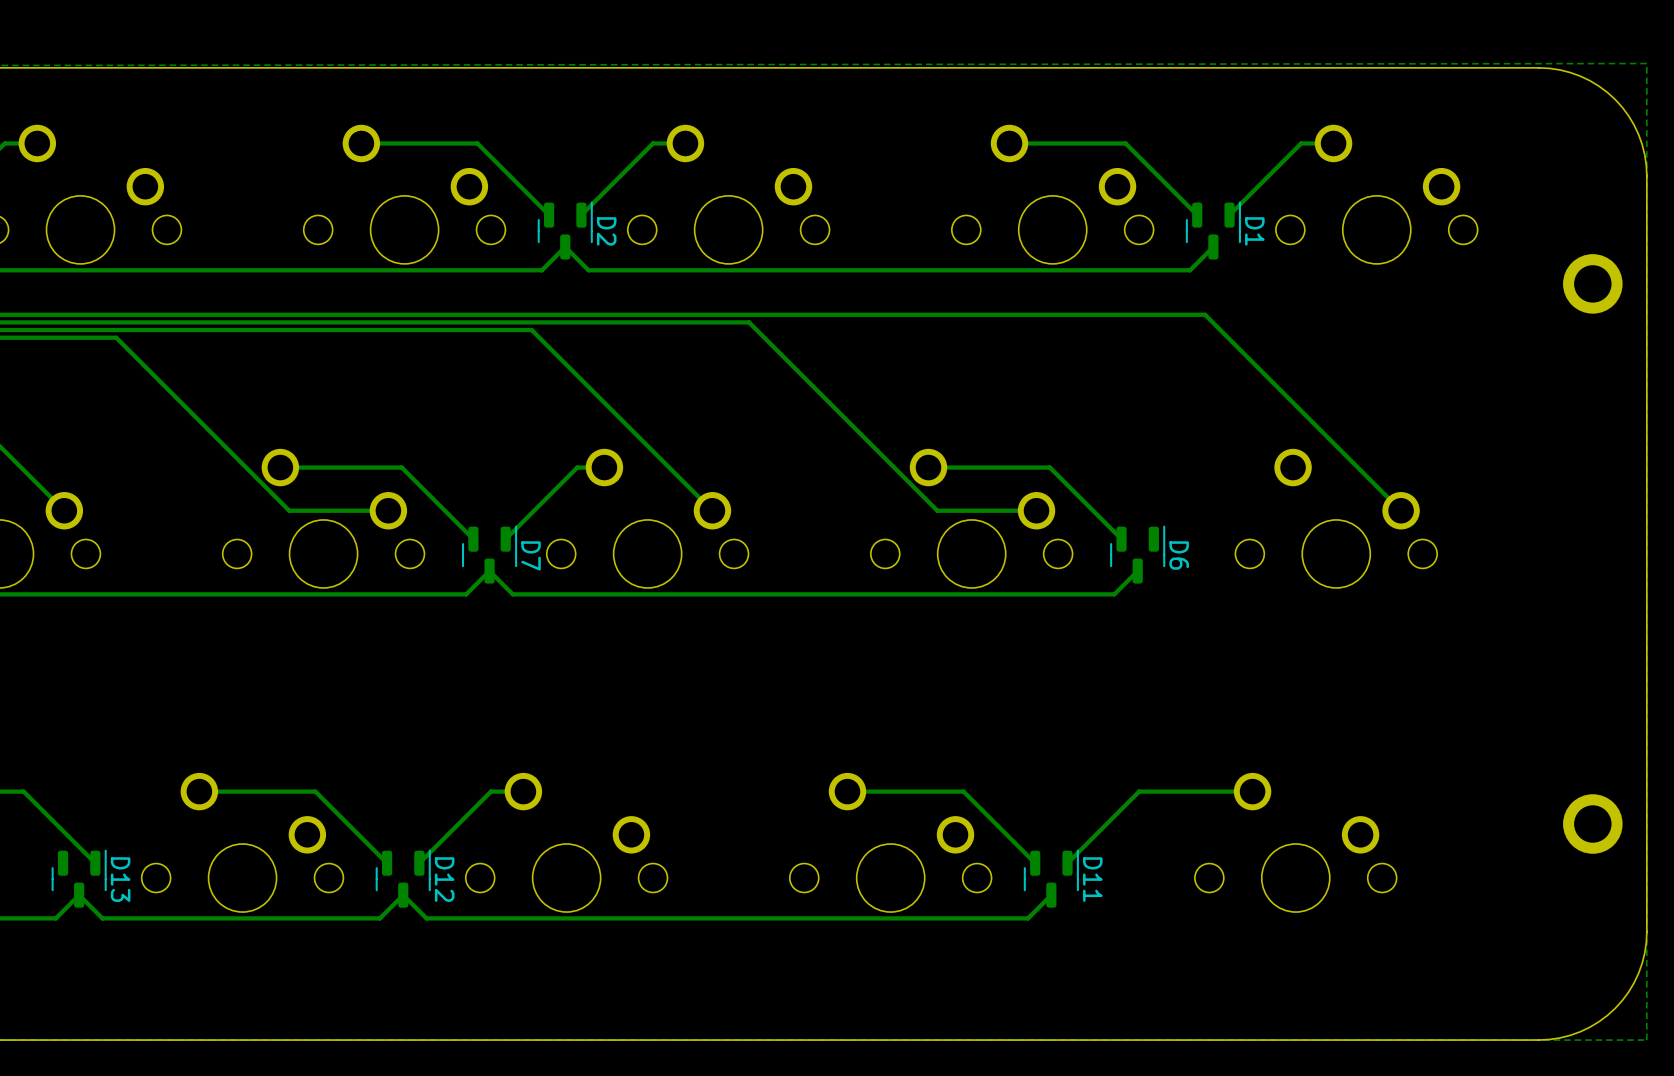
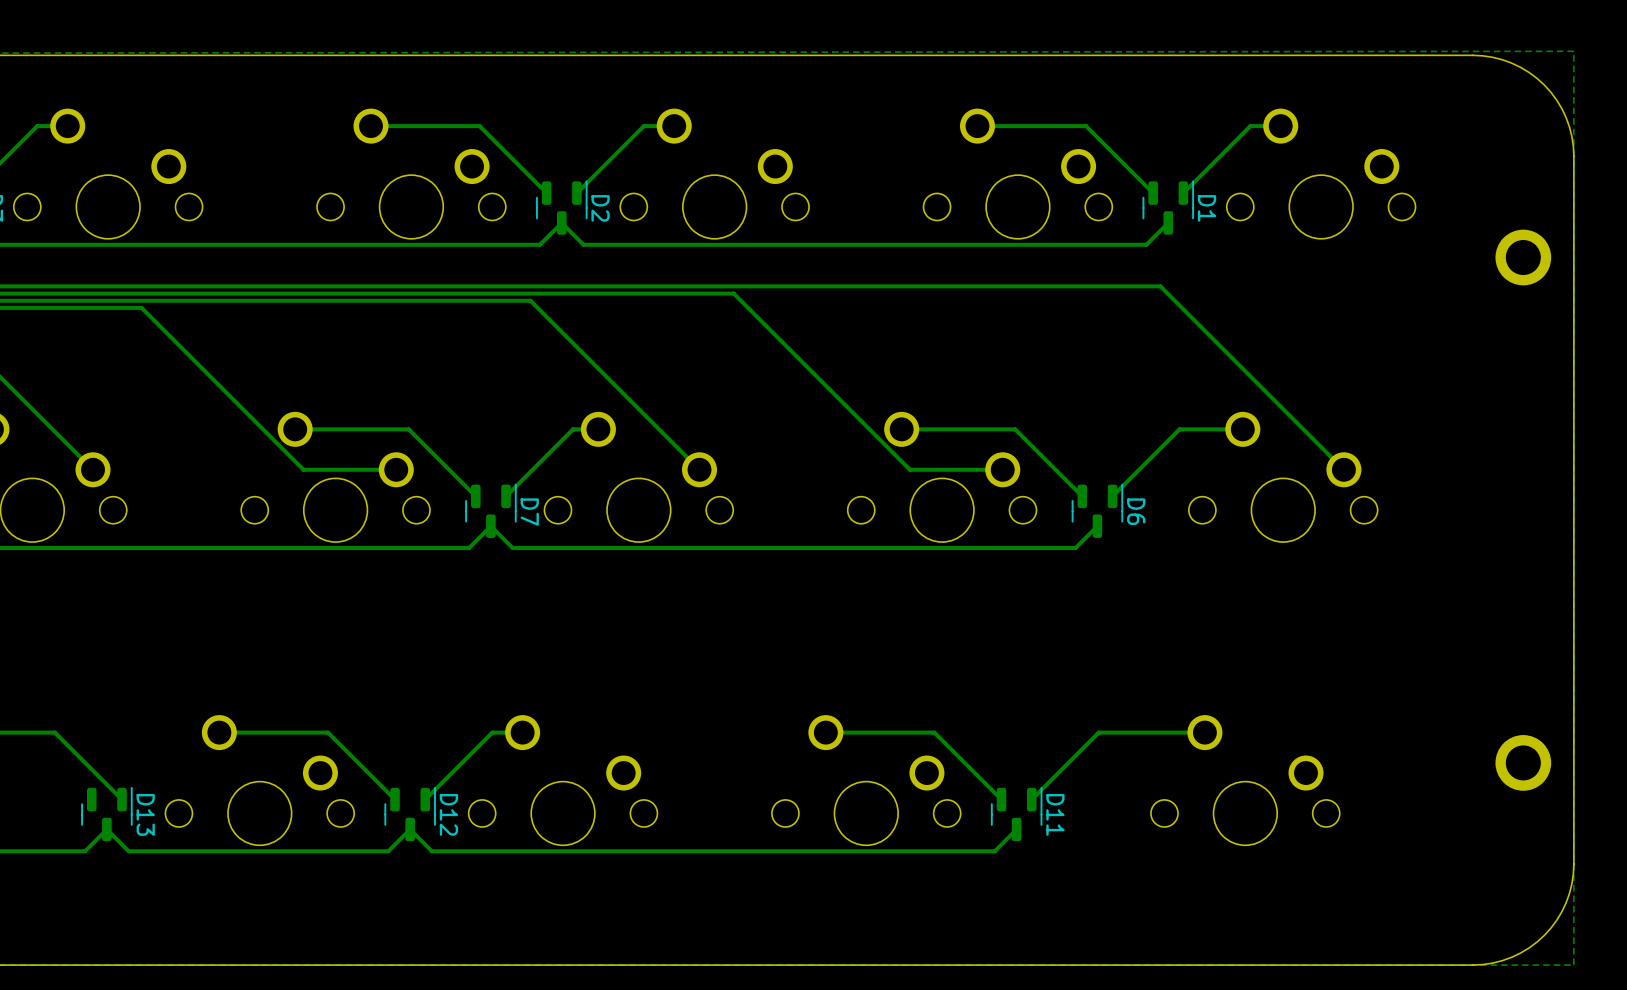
track: none -> (1242, 429) (1179, 429) (1112, 496)

